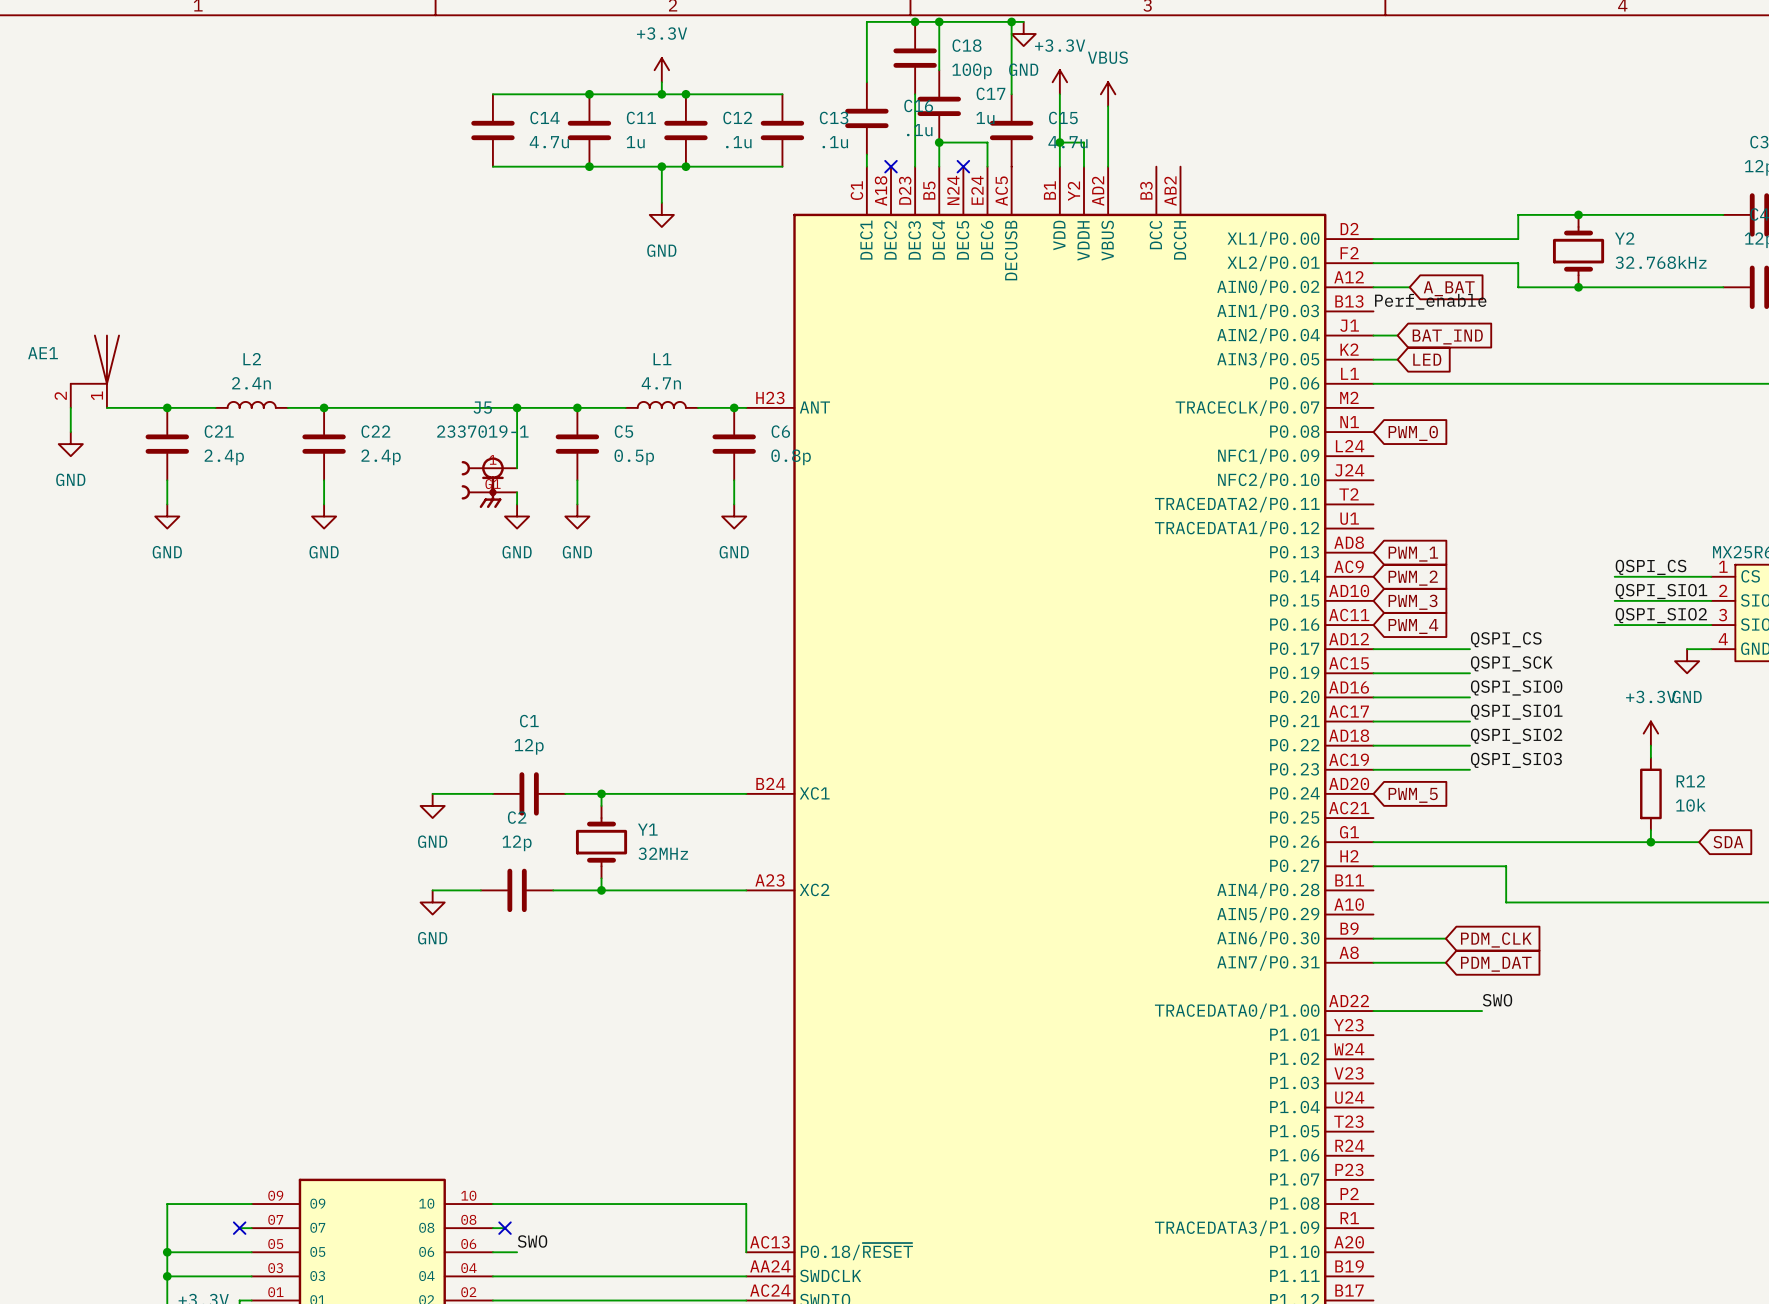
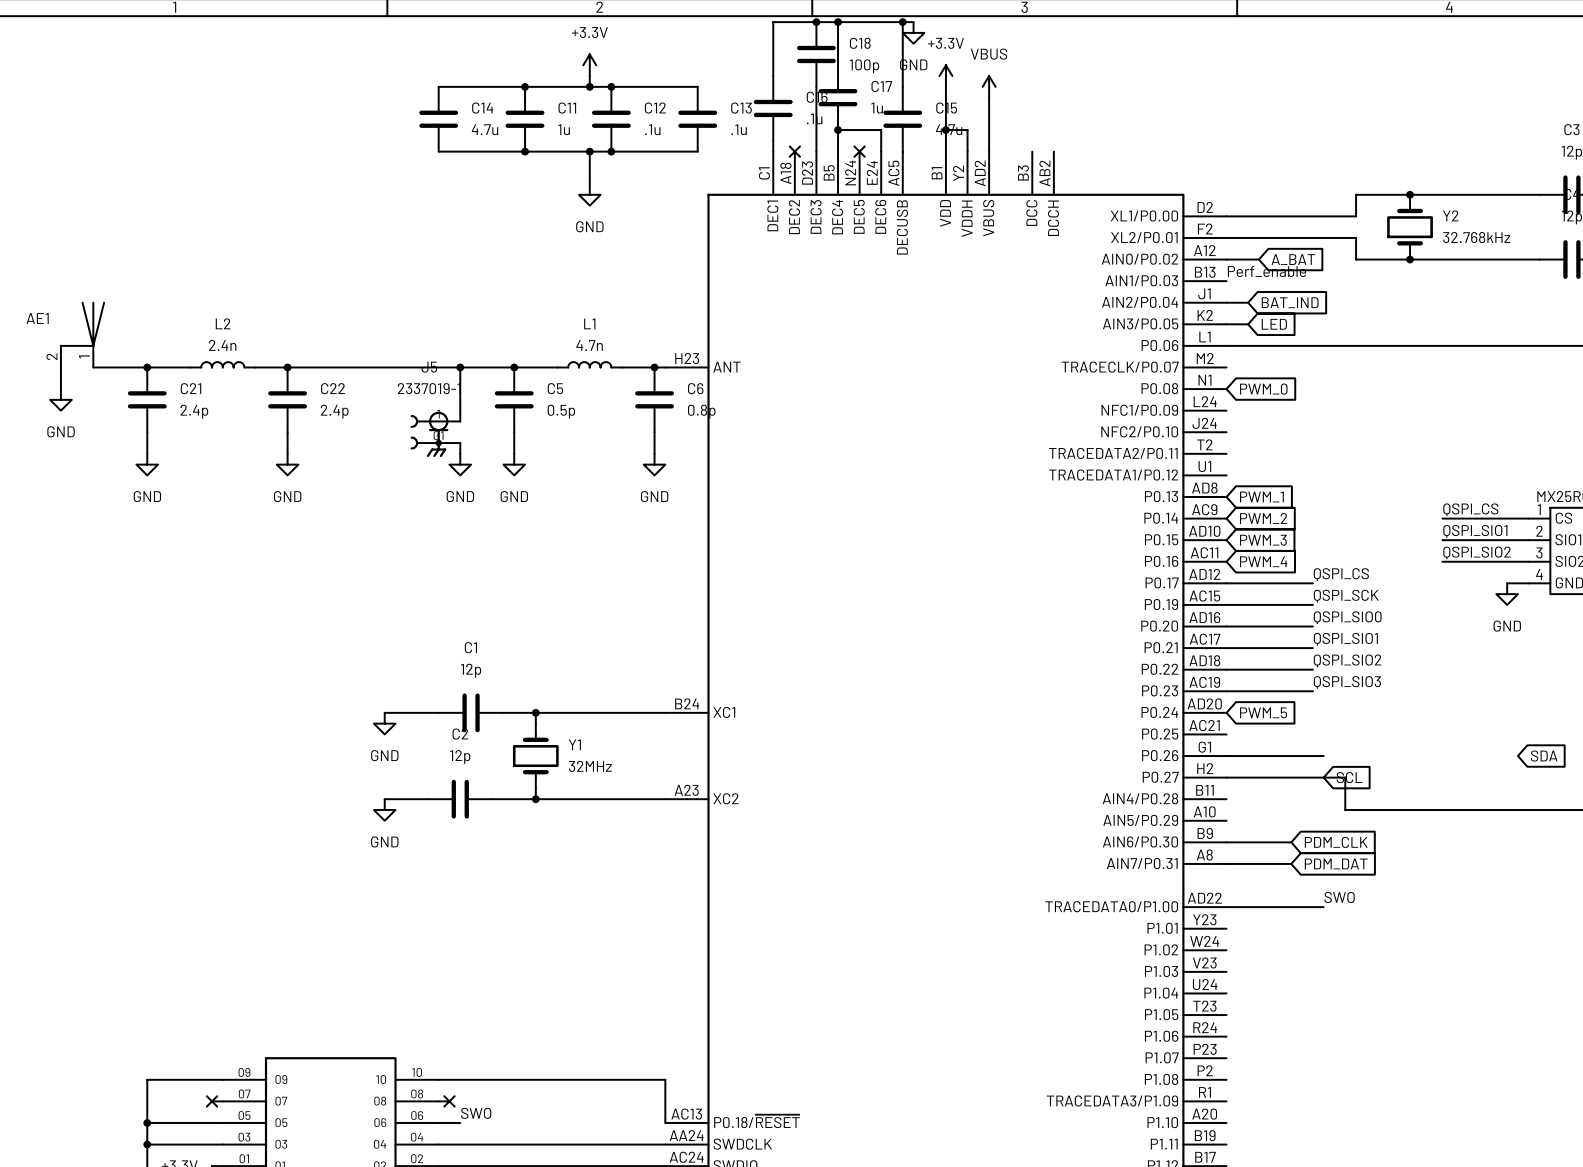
power symbol: +3.3V (1650, 733) -> none
wire: (1650, 745) (1650, 757) -> none
R12: 10k (1650, 793) -> none
wire: (1650, 830) (1650, 842) -> none
wire: (1482, 842) (1699, 842) -> none
junction: (1650, 842) -> none
global label: none -> SCL (1349, 777)

